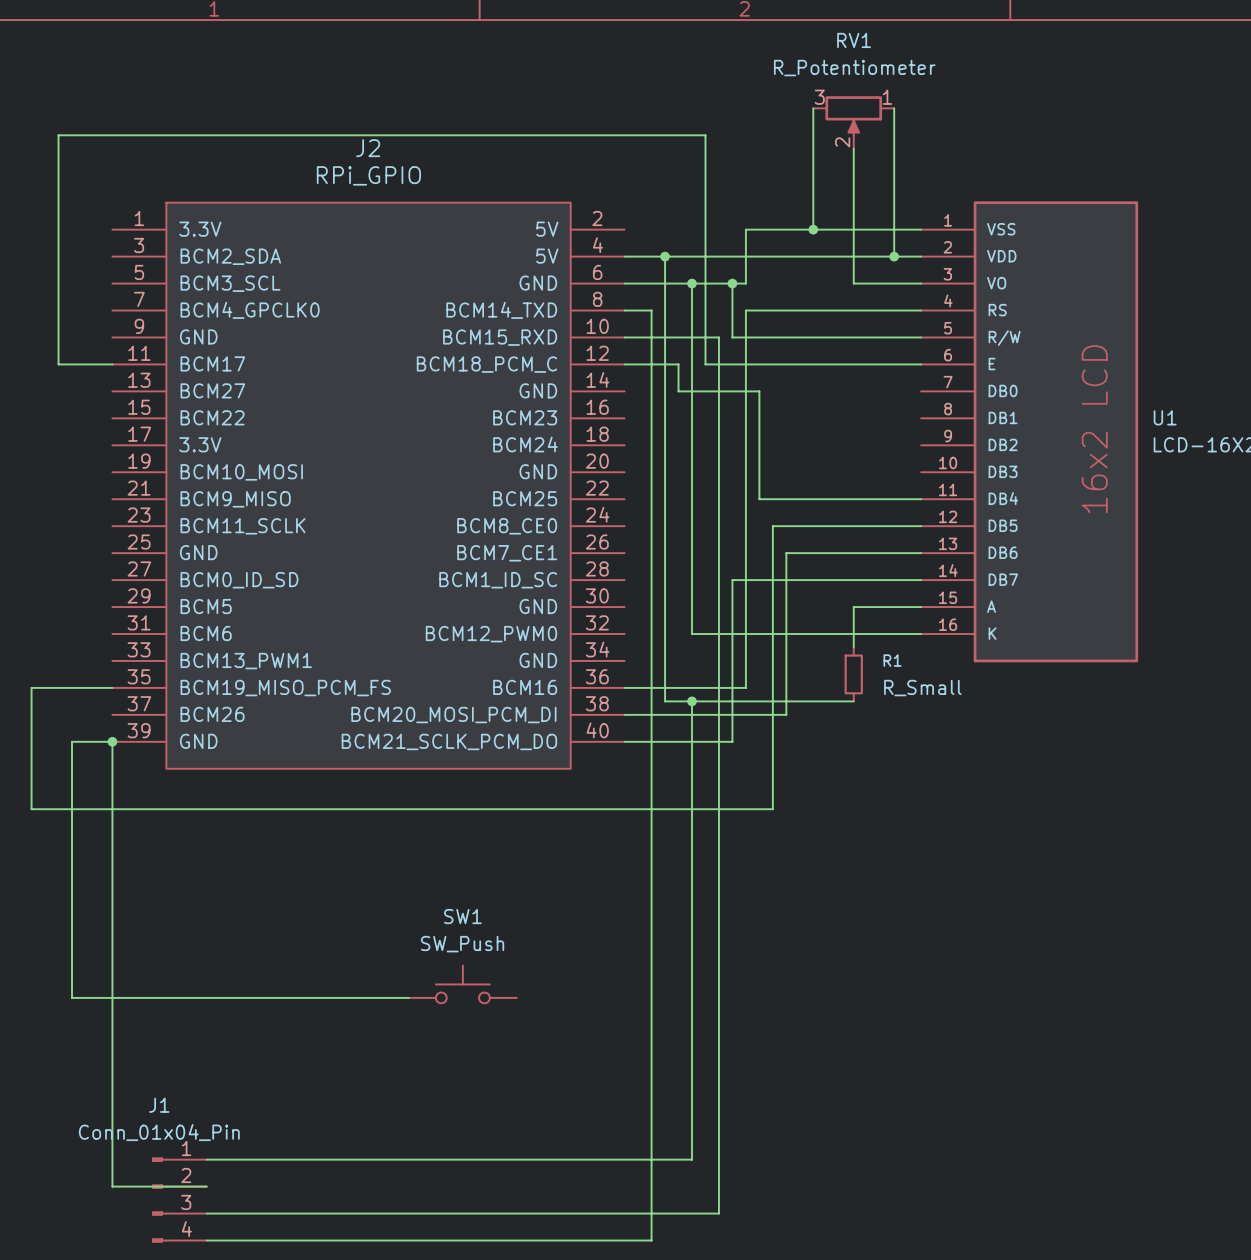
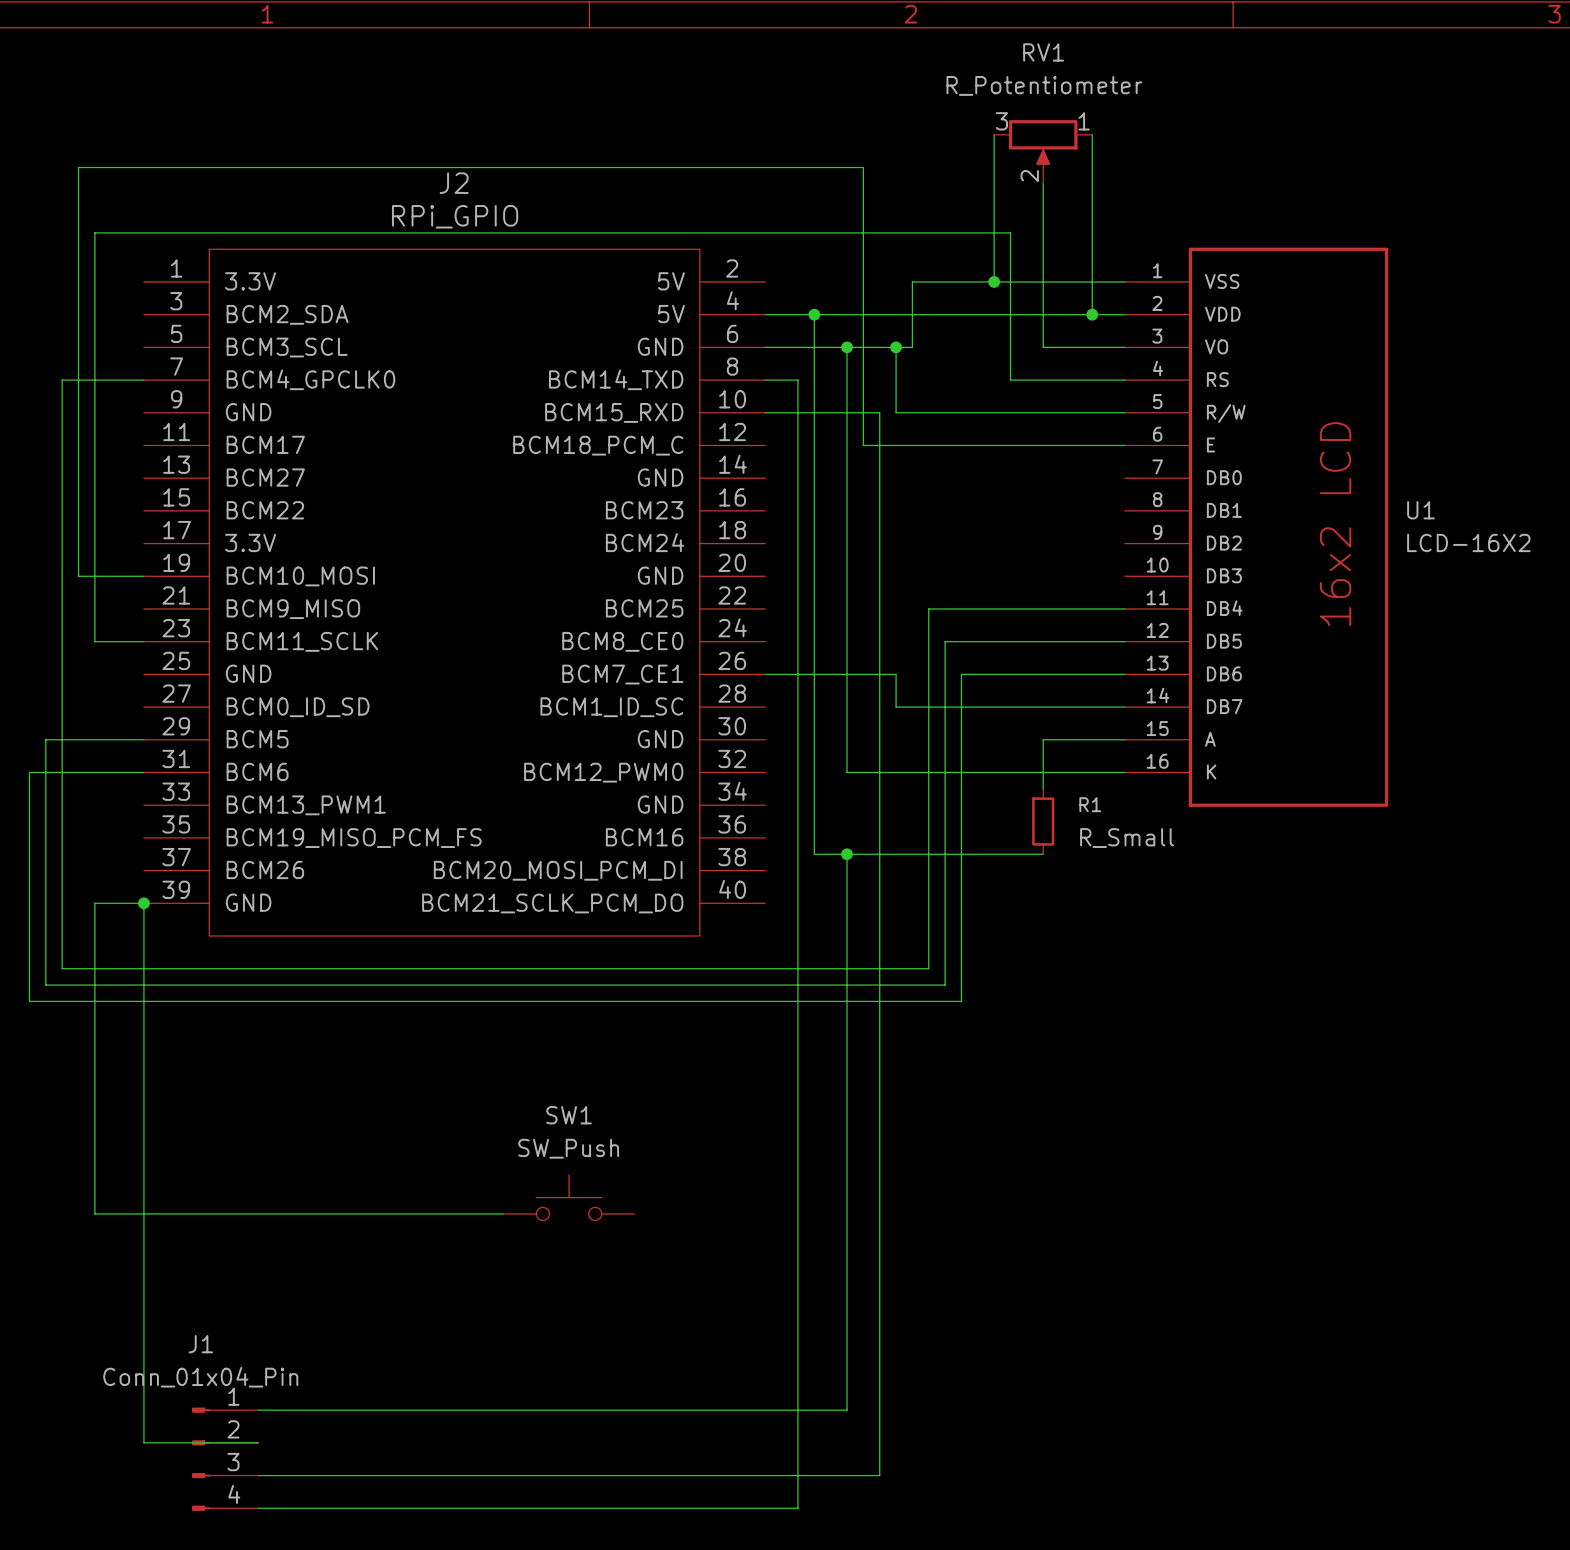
wire: (826, 310) (745, 310) (745, 687) (624, 687) -> (1010, 380) (1010, 232) (94, 232) (94, 641) (143, 641)
wire: (58, 364) (112, 364) -> (78, 445) (78, 576) (143, 576)
wire: (624, 364) (678, 364) (678, 391) (759, 391) (759, 499) -> (143, 380) (62, 380) (62, 968) (928, 968) (928, 608)
wire: (732, 580) (732, 741) (624, 741) -> (896, 707) (896, 674) (765, 674)
wire: (31, 687) (112, 687) -> (45, 837) (45, 739) (143, 739)
wire: (624, 714) (786, 714) -> (143, 772) (29, 772) (29, 1001) (961, 1001) (961, 870)

